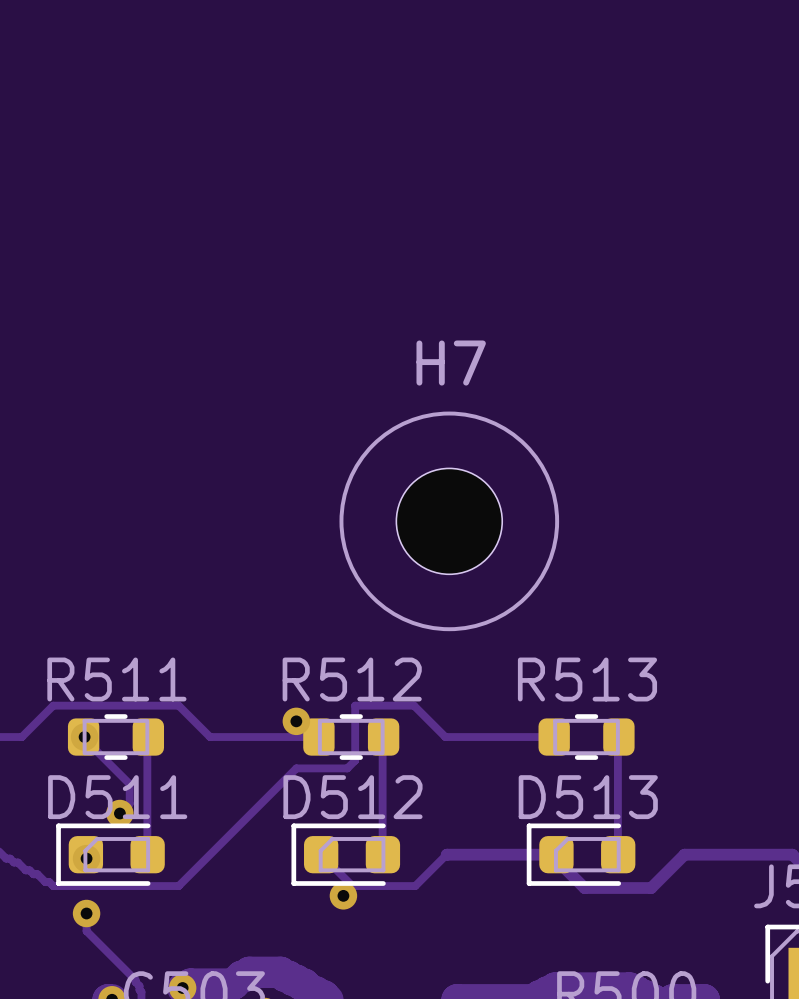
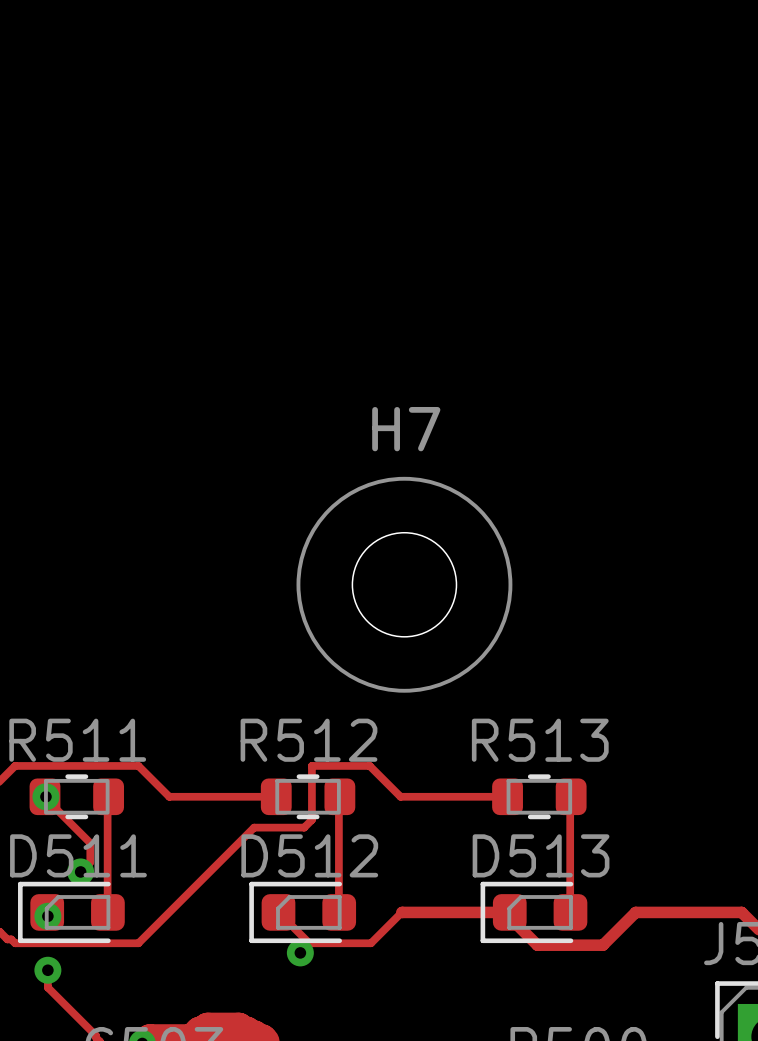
via: (296, 721) -> none

